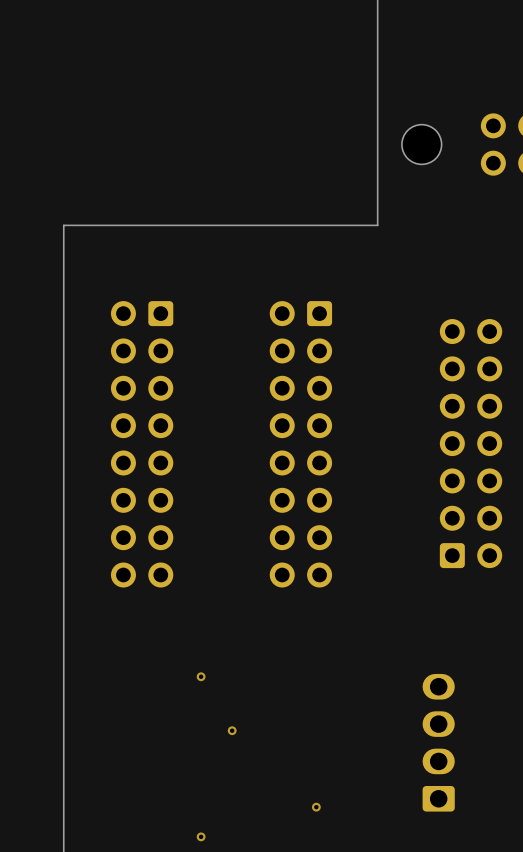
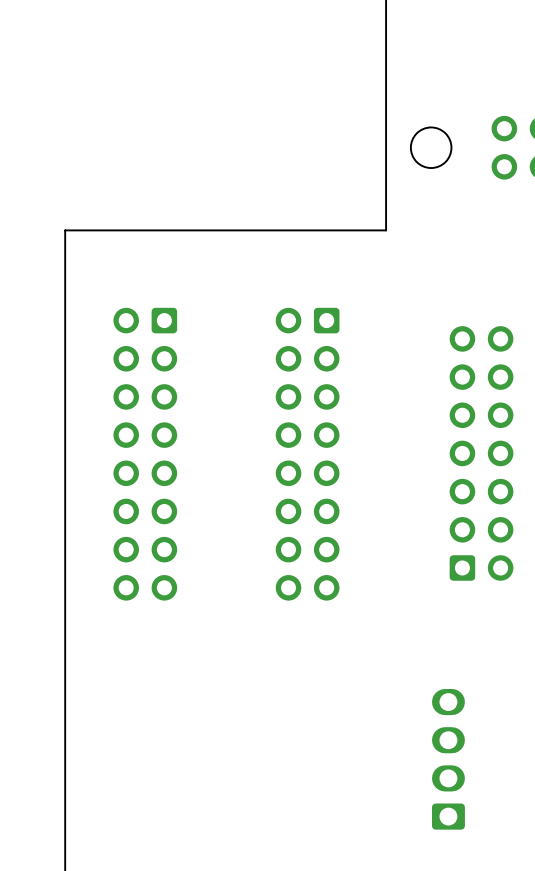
via: (201, 676) -> none
via: (232, 730) -> none
via: (316, 807) -> none
via: (201, 836) -> none

